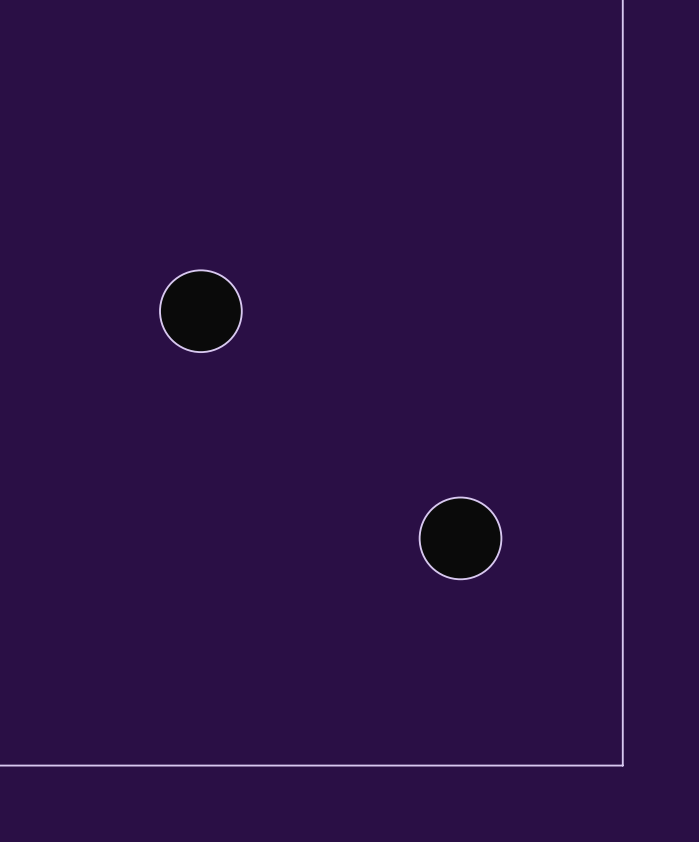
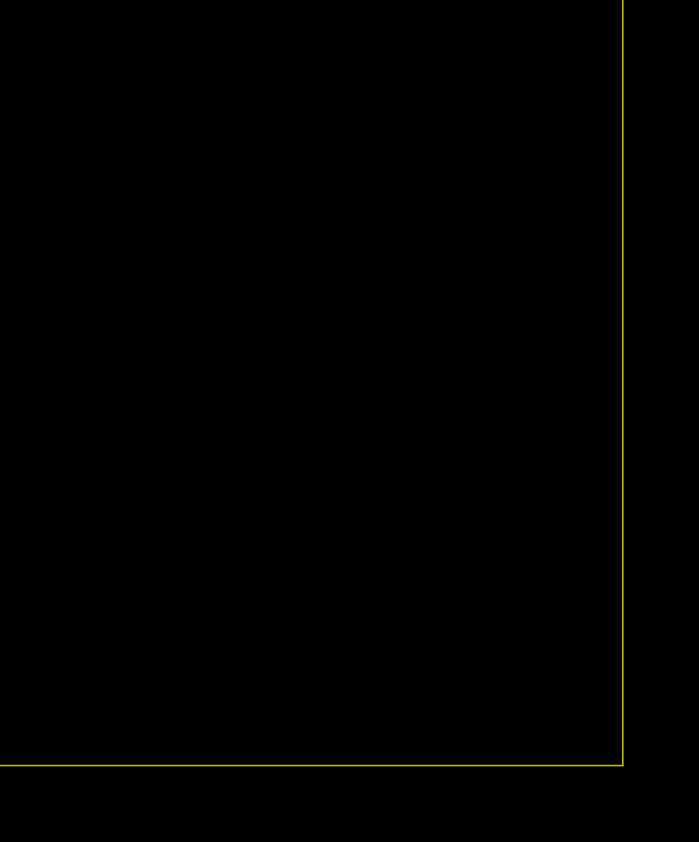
part: (200, 311) -> none
part: (460, 538) -> none

